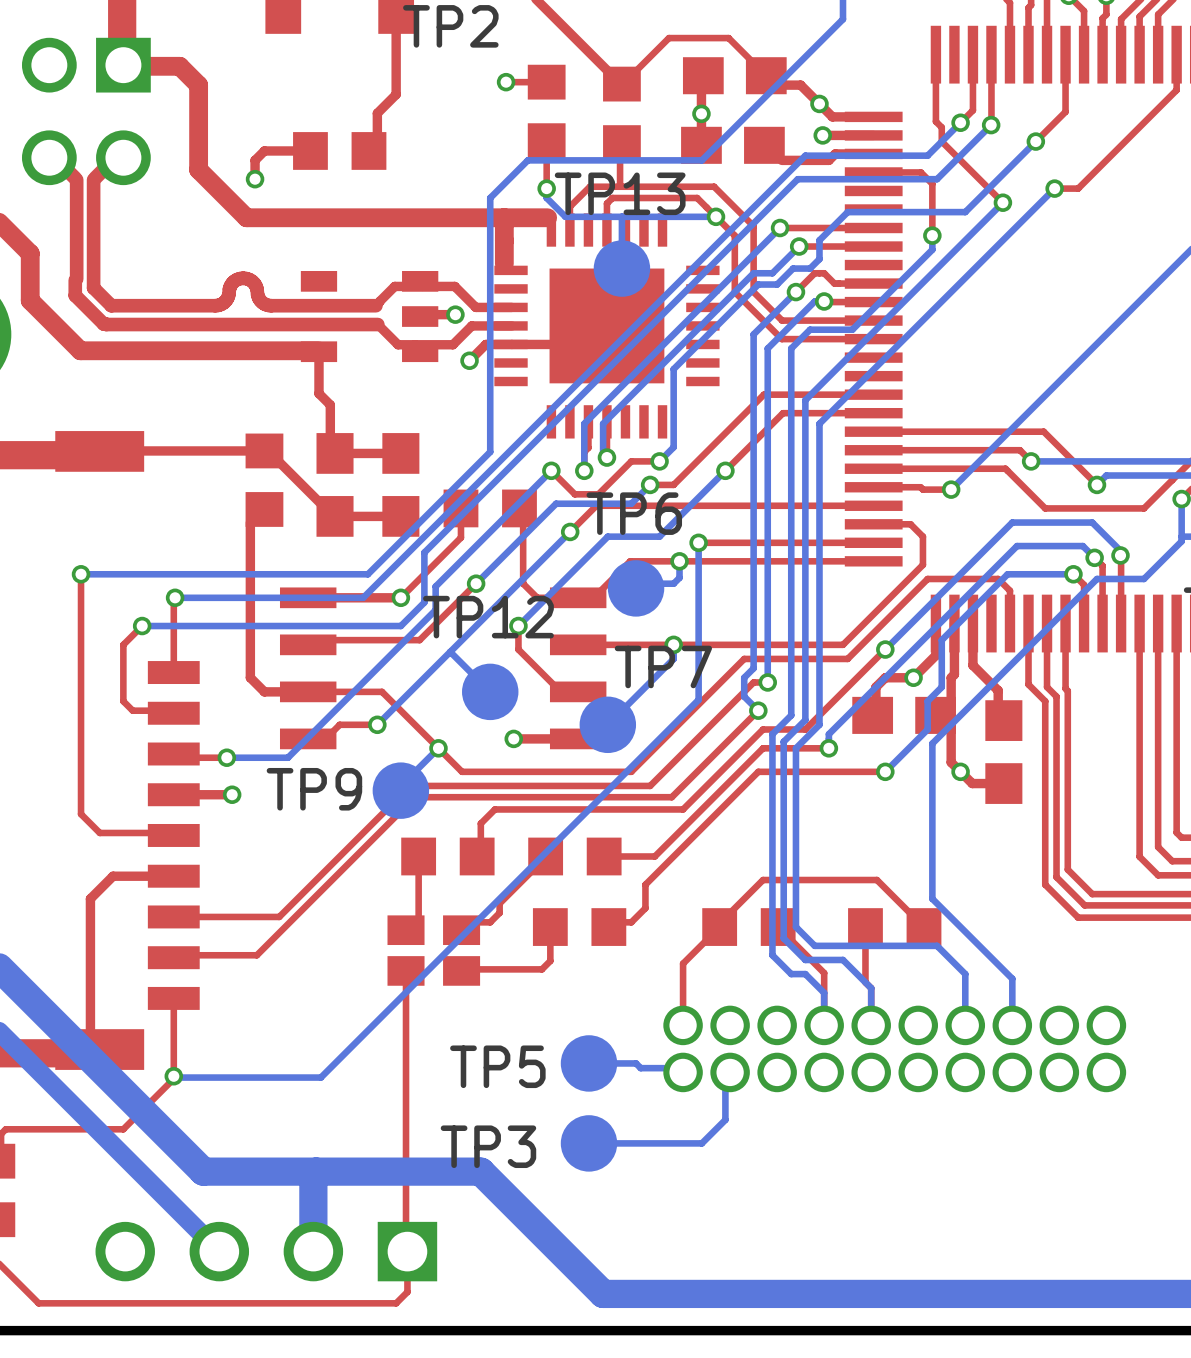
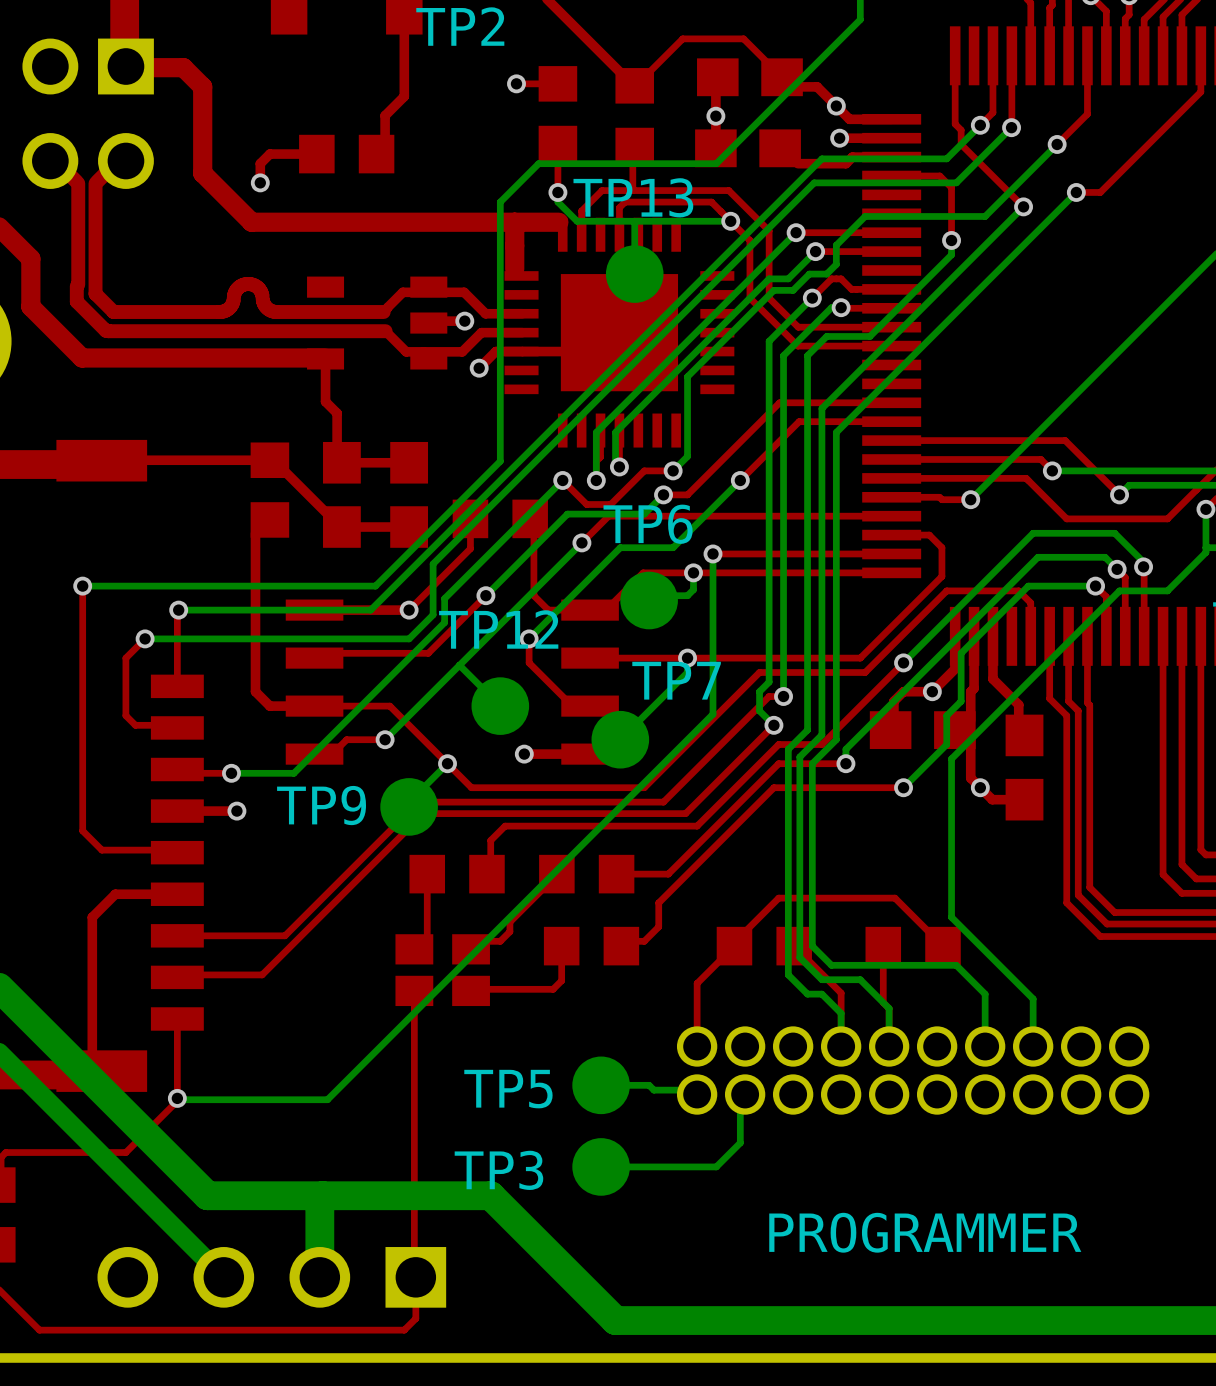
text: none -> PROGRAMMER (925, 1232)

